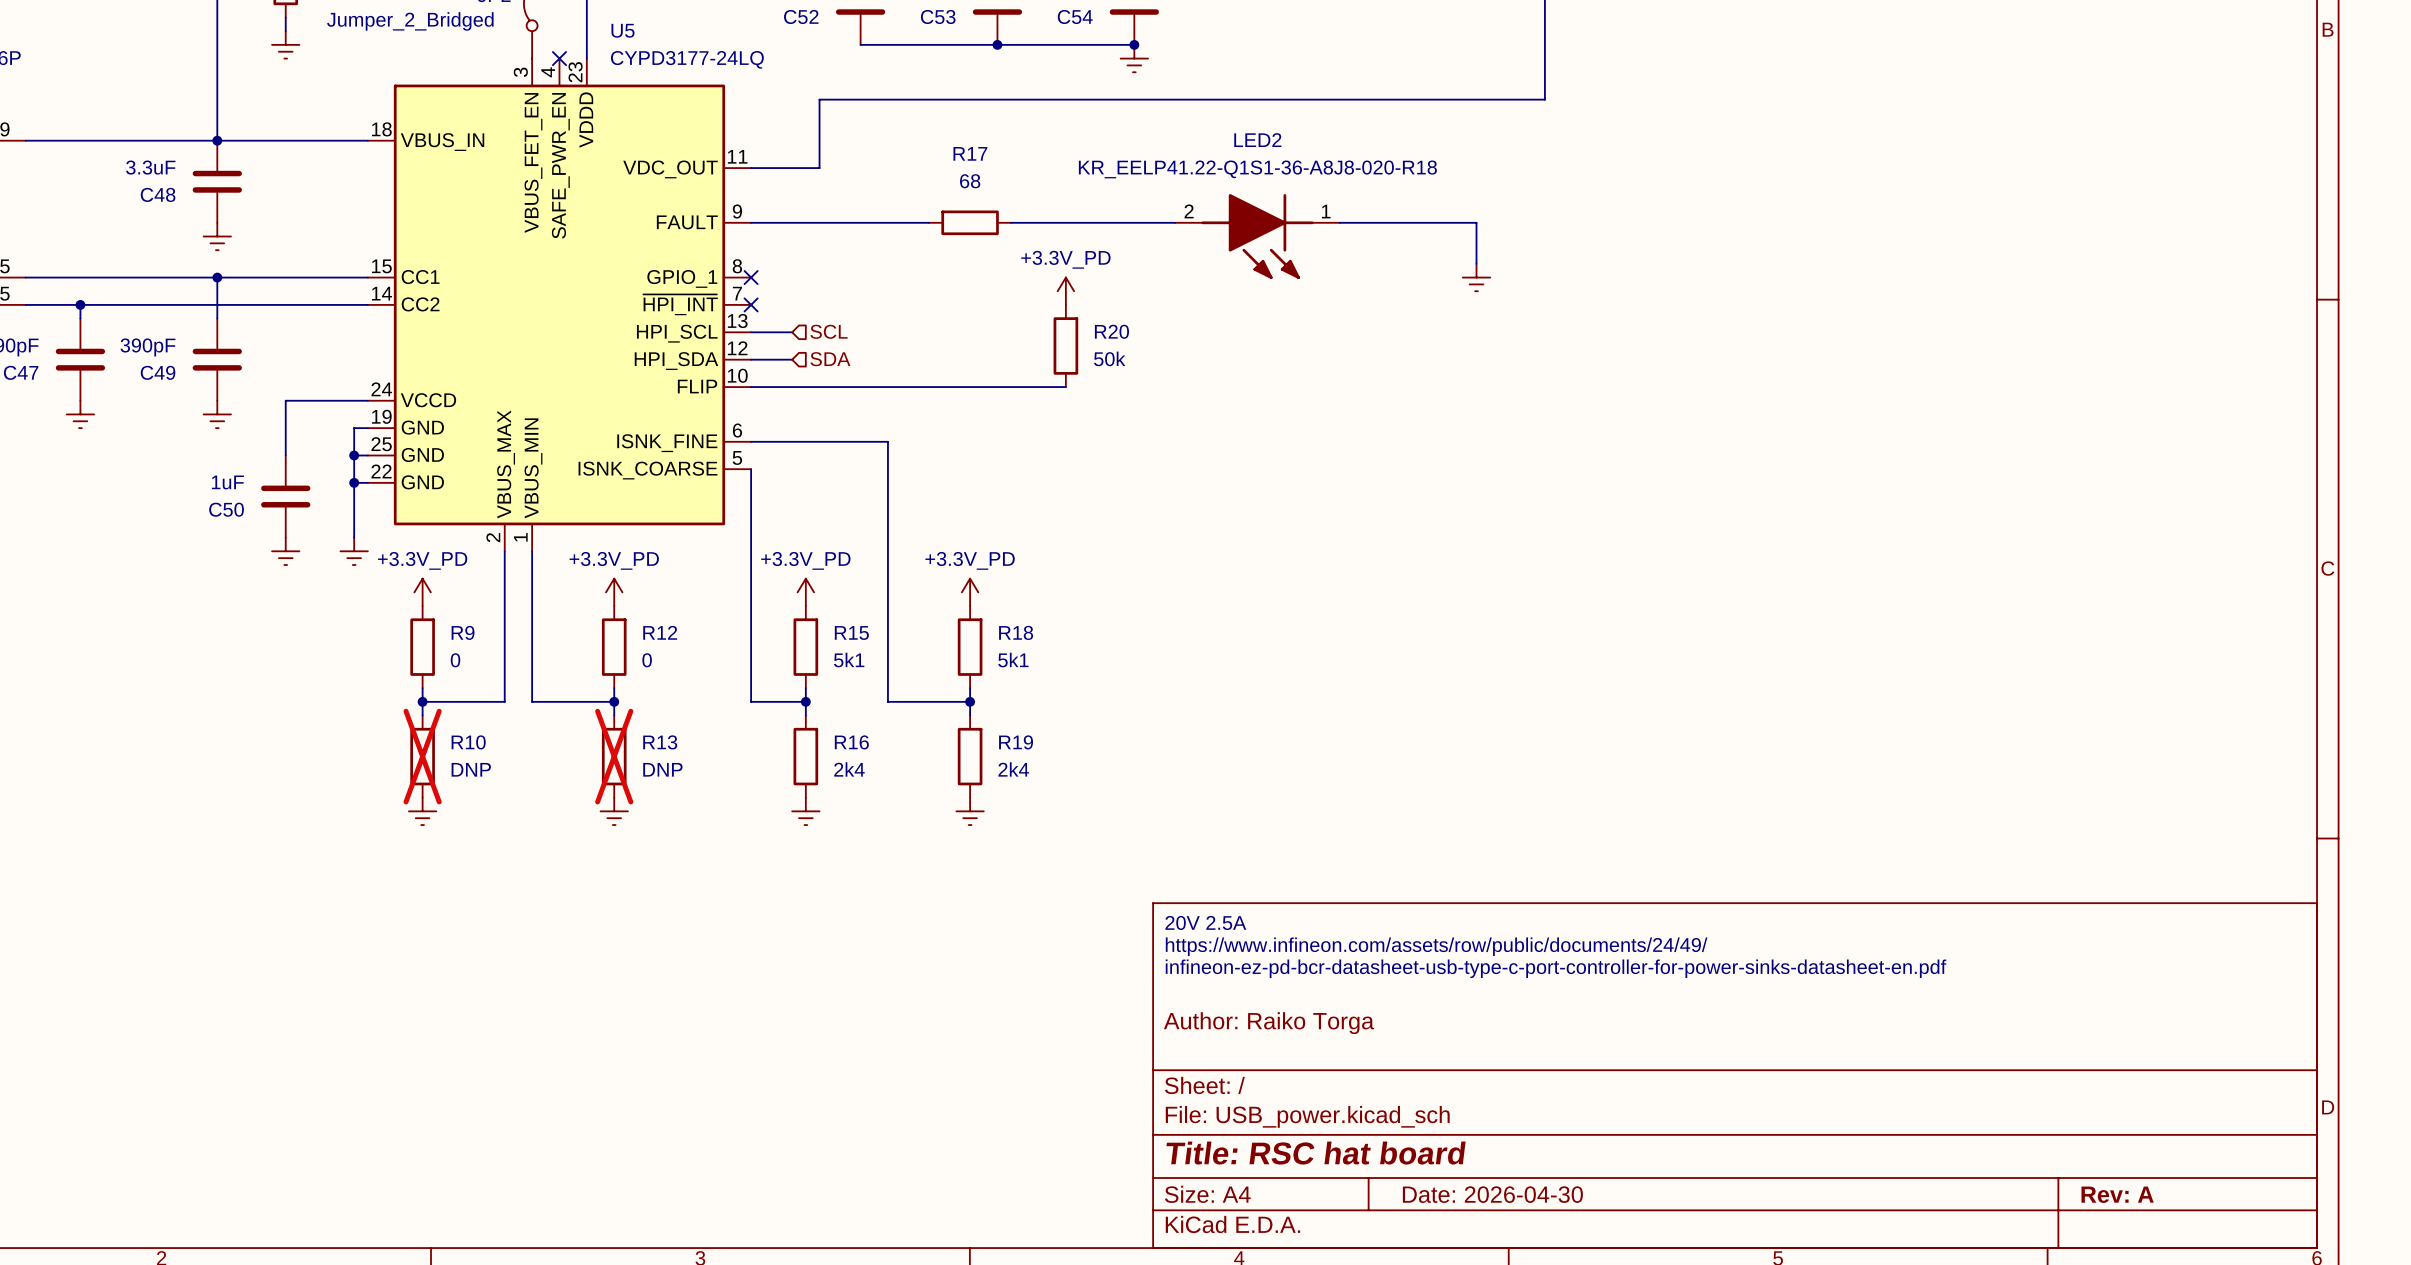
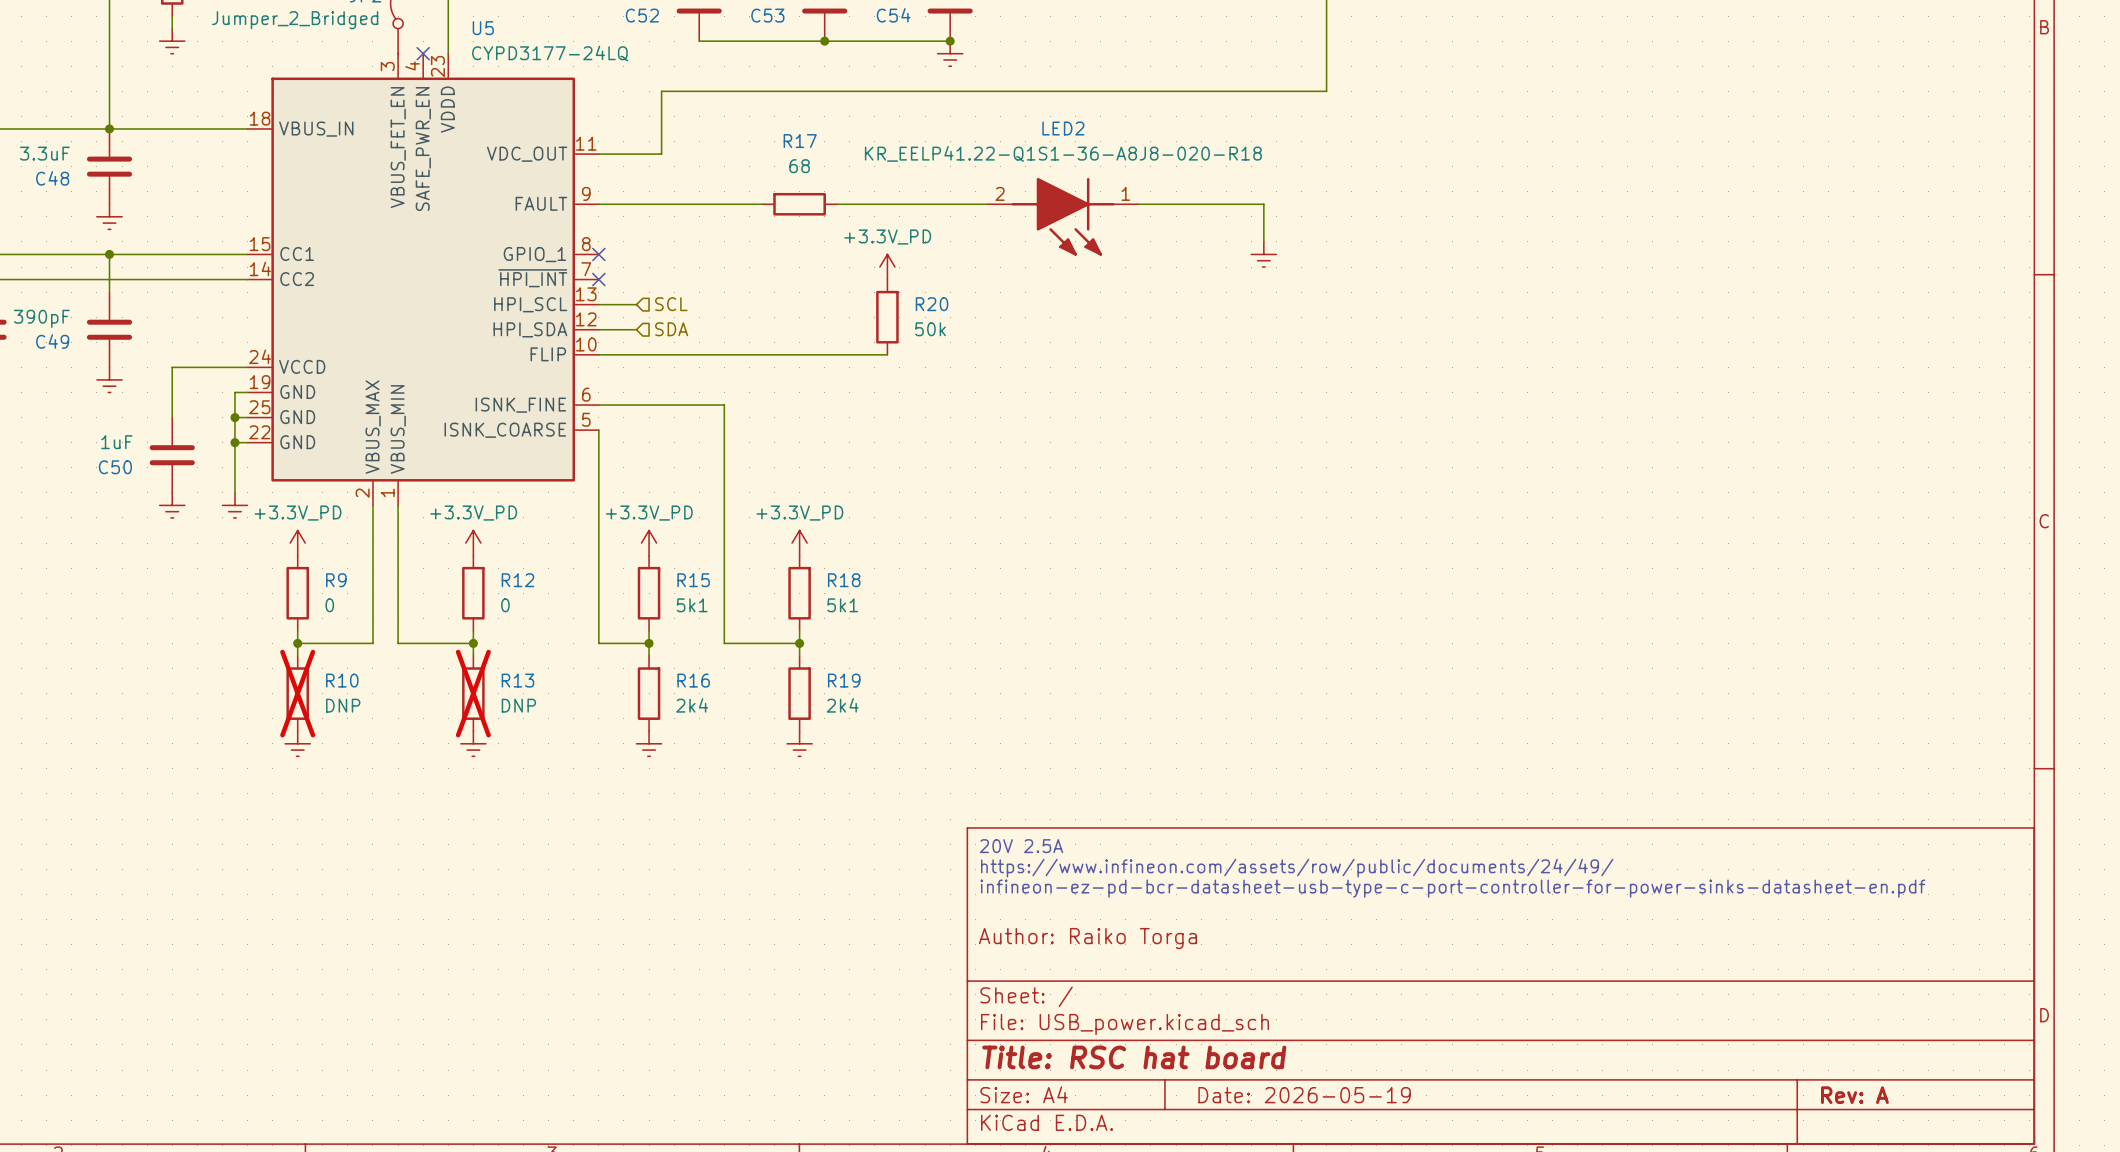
title block: Date: 2026-04-30 (1492, 1194) -> Date: 2026-05-19 (1304, 1095)

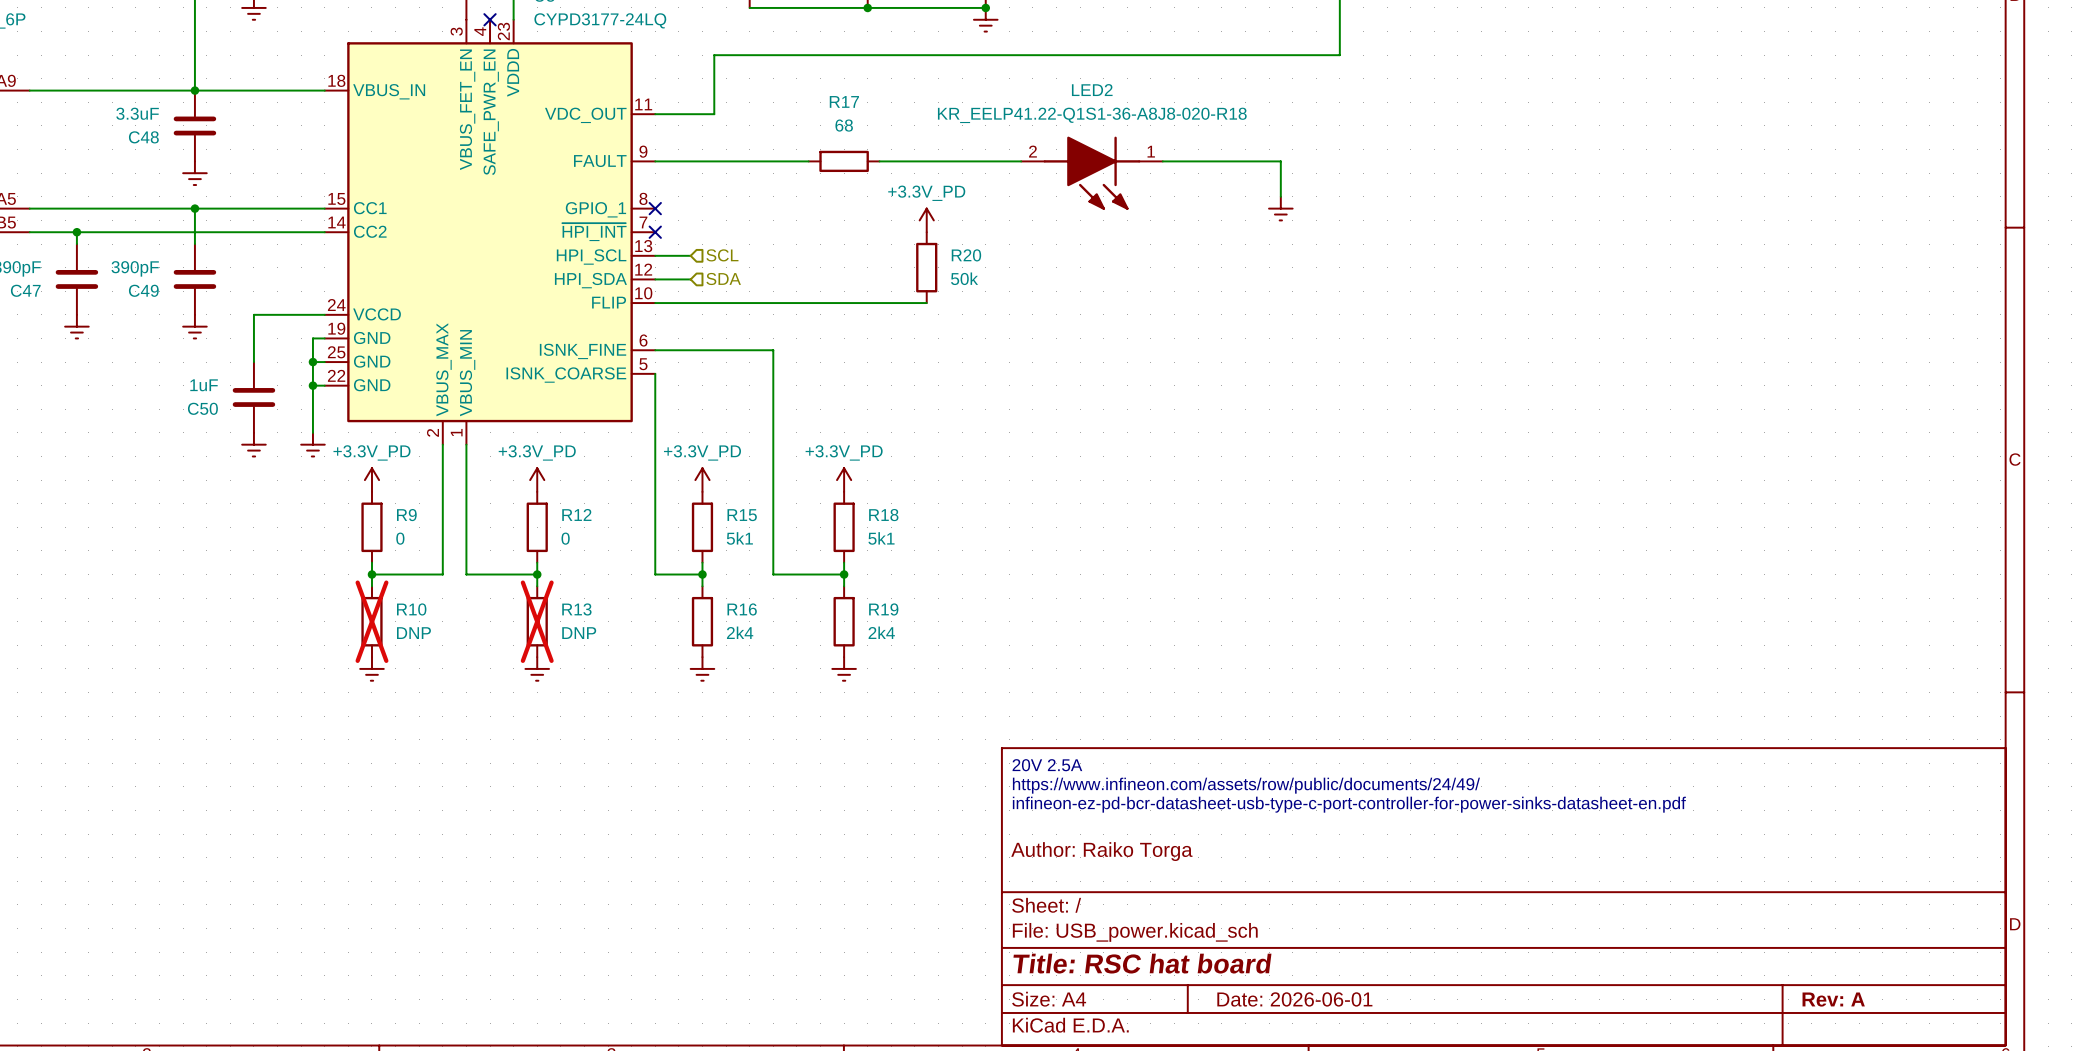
title block: Date: 2026-05-19 (1304, 1095) -> Date: 2026-06-01 (1294, 999)

